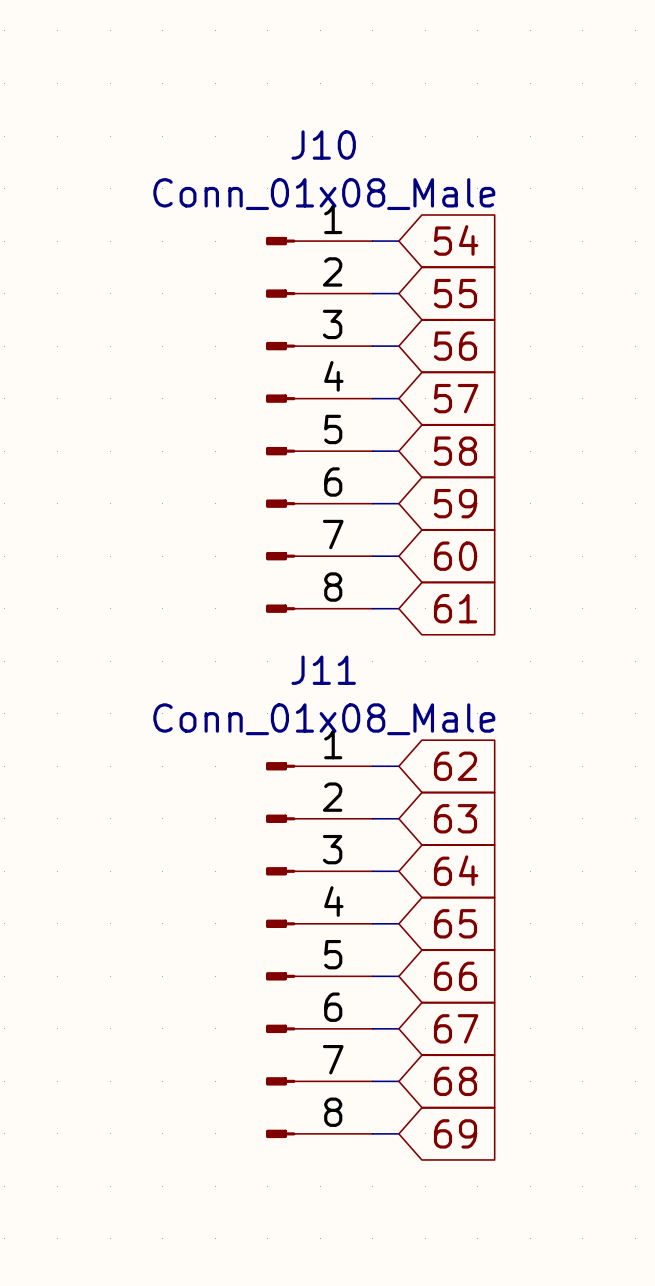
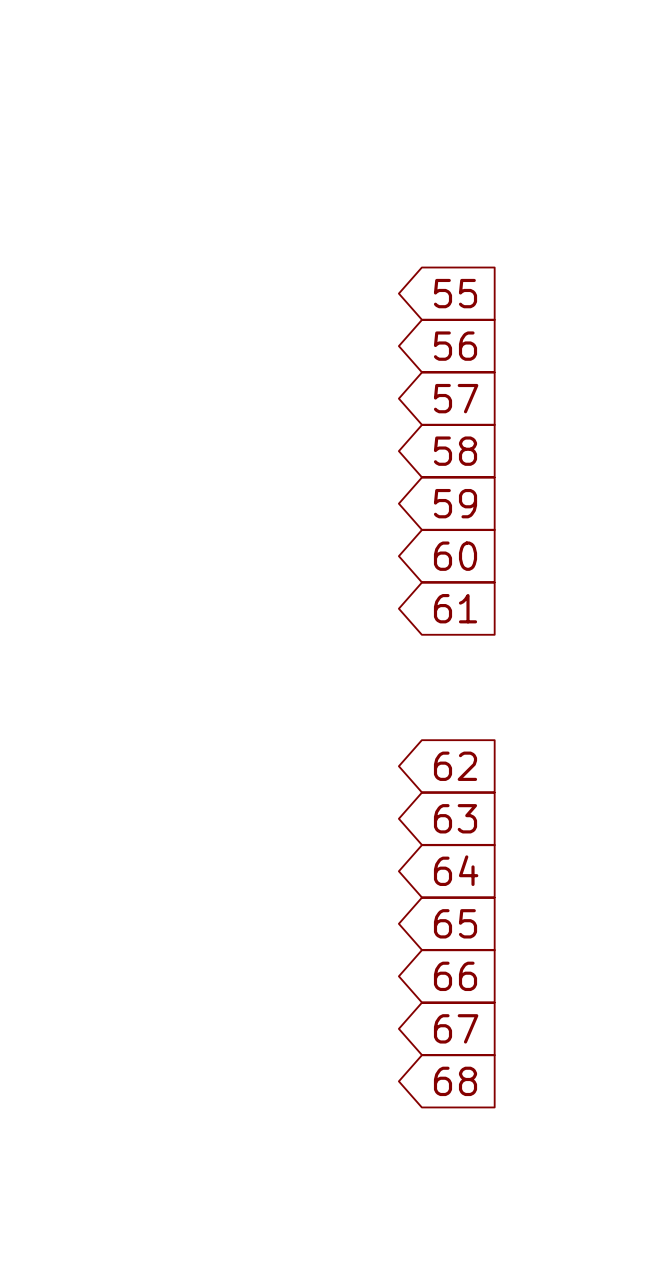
global label: 54 (456, 240) -> none
wire: (372, 241) (398, 241) -> none
wire: (372, 293) (398, 293) -> none
wire: (372, 346) (398, 346) -> none
wire: (372, 398) (398, 398) -> none
J10: Conn_01x08_Male (319, 424) -> none
wire: (372, 451) (398, 451) -> none
wire: (372, 503) (398, 503) -> none
wire: (372, 556) (398, 556) -> none
wire: (372, 608) (398, 608) -> none
wire: (372, 766) (398, 766) -> none
wire: (372, 818) (398, 818) -> none
wire: (372, 871) (398, 871) -> none
wire: (372, 923) (398, 923) -> none
J11: Conn_01x08_Male (319, 950) -> none
wire: (372, 976) (398, 976) -> none
wire: (372, 1028) (398, 1028) -> none
wire: (372, 1081) (398, 1081) -> none
wire: (372, 1133) (398, 1133) -> none
global label: 69 (455, 1133) -> none

